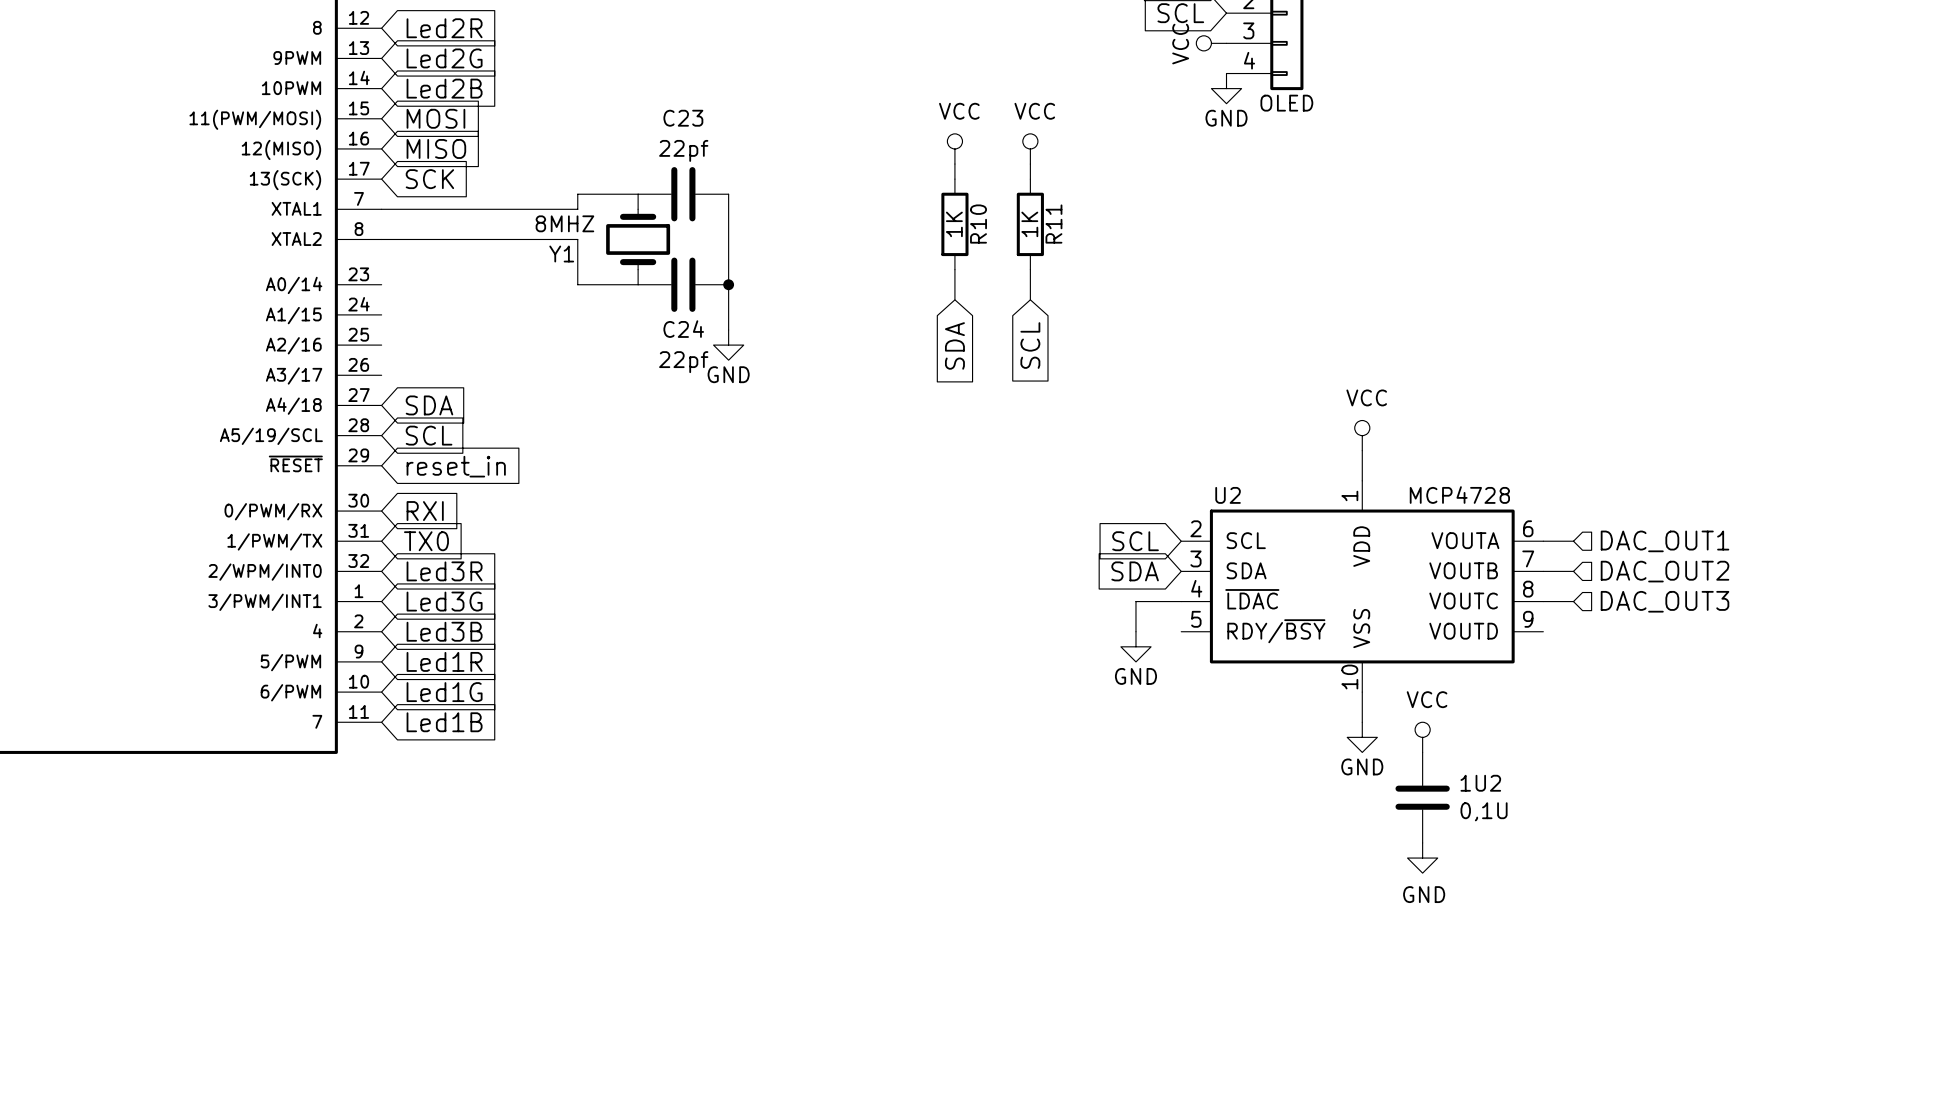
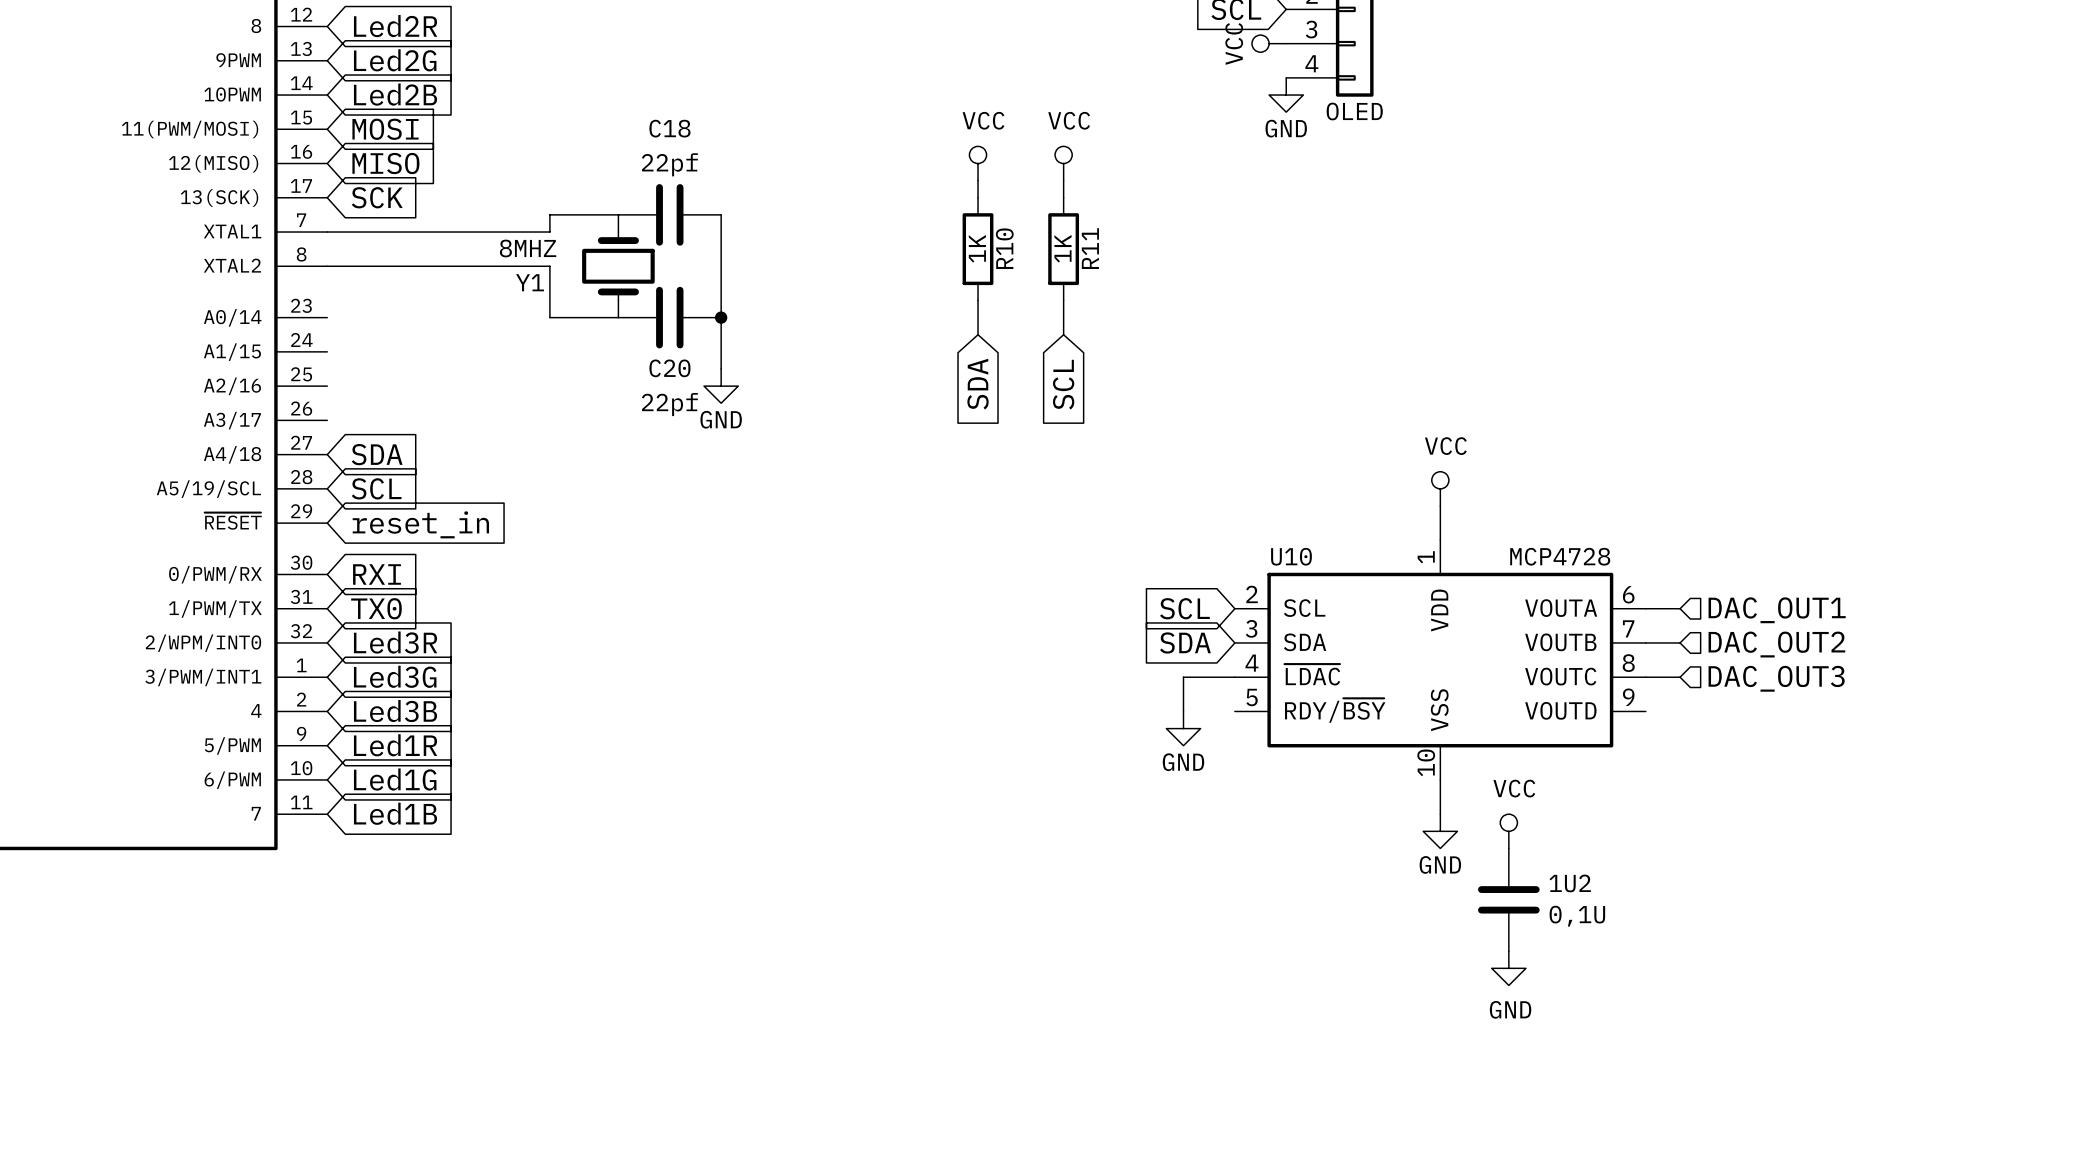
C23 name: C23 (683, 118) -> C18 (669, 128)
C24 name: C24 (683, 329) -> C20 (669, 368)
U2 name: U2 (1228, 495) -> U10 (1291, 556)

